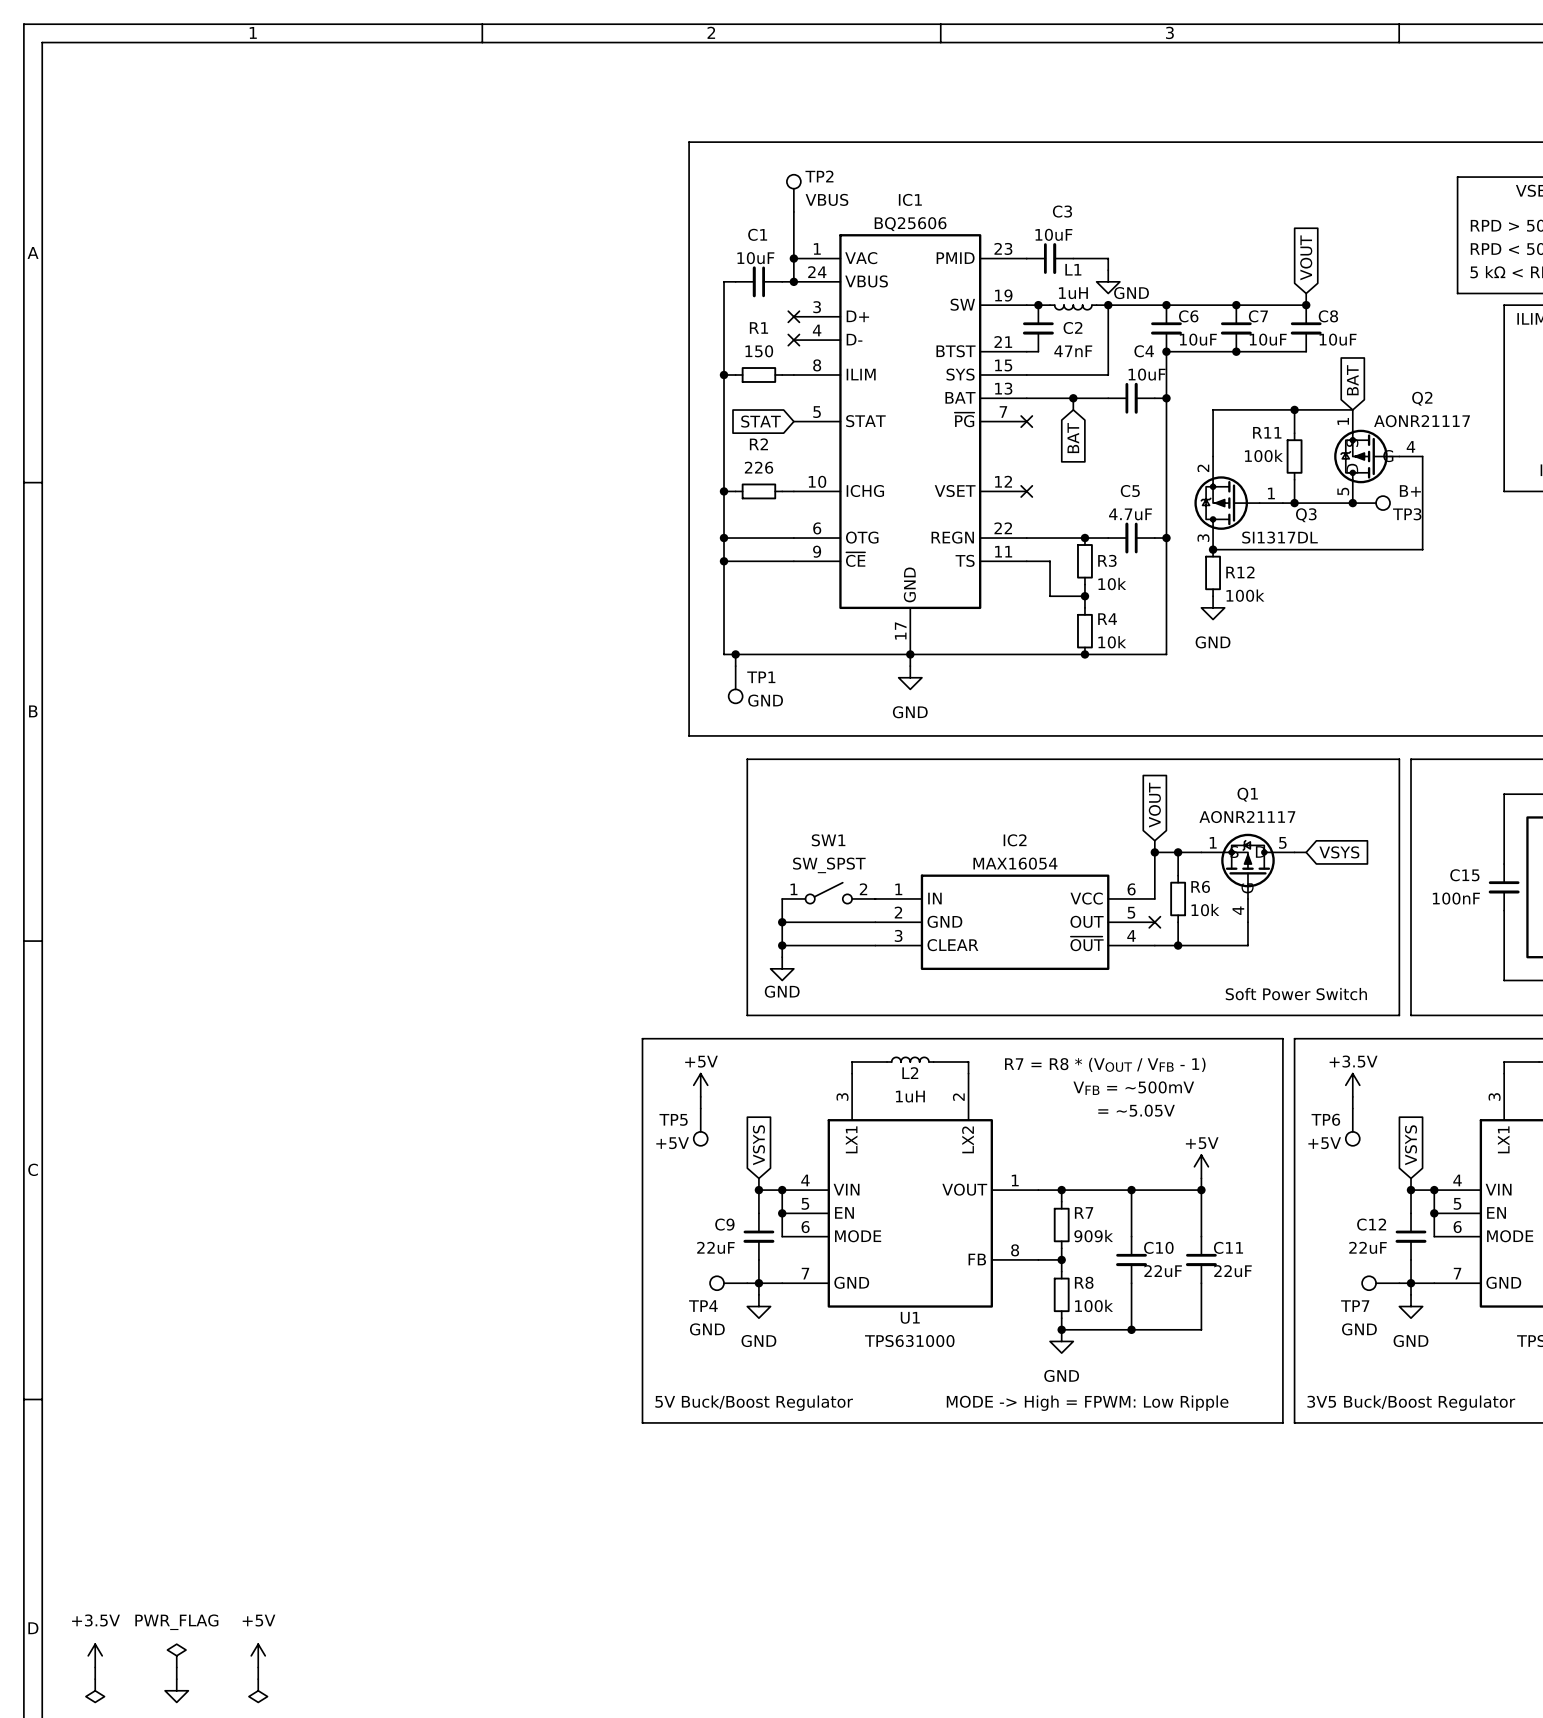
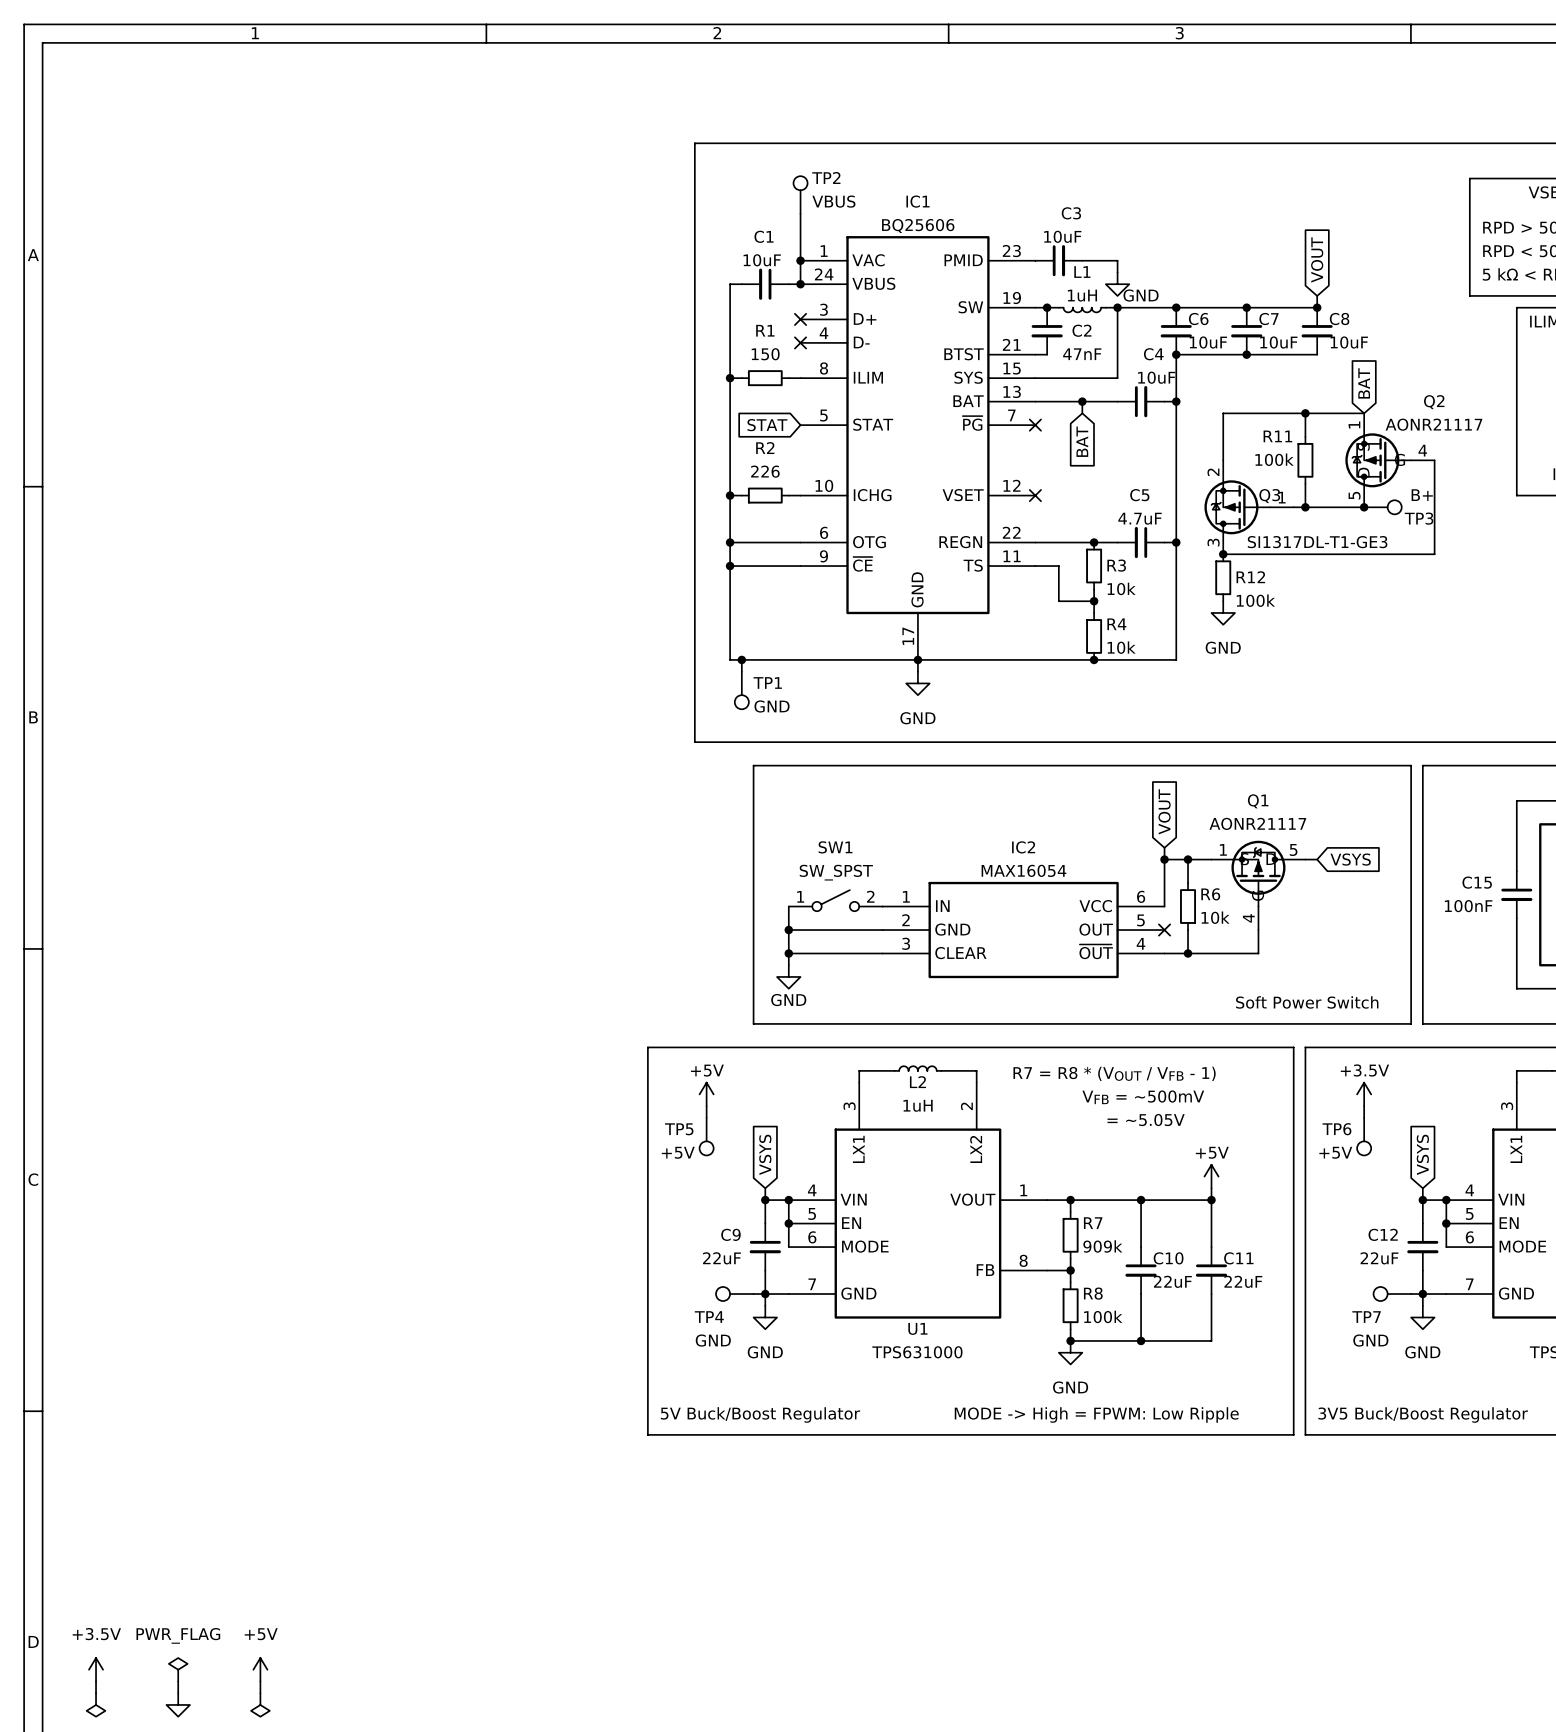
Q3 name position: Q3 (1306, 515) -> Q3 (1269, 496)
Q3 value: SI1317DL (1279, 537) -> SI1317DL-T1-GE3 (1317, 542)

